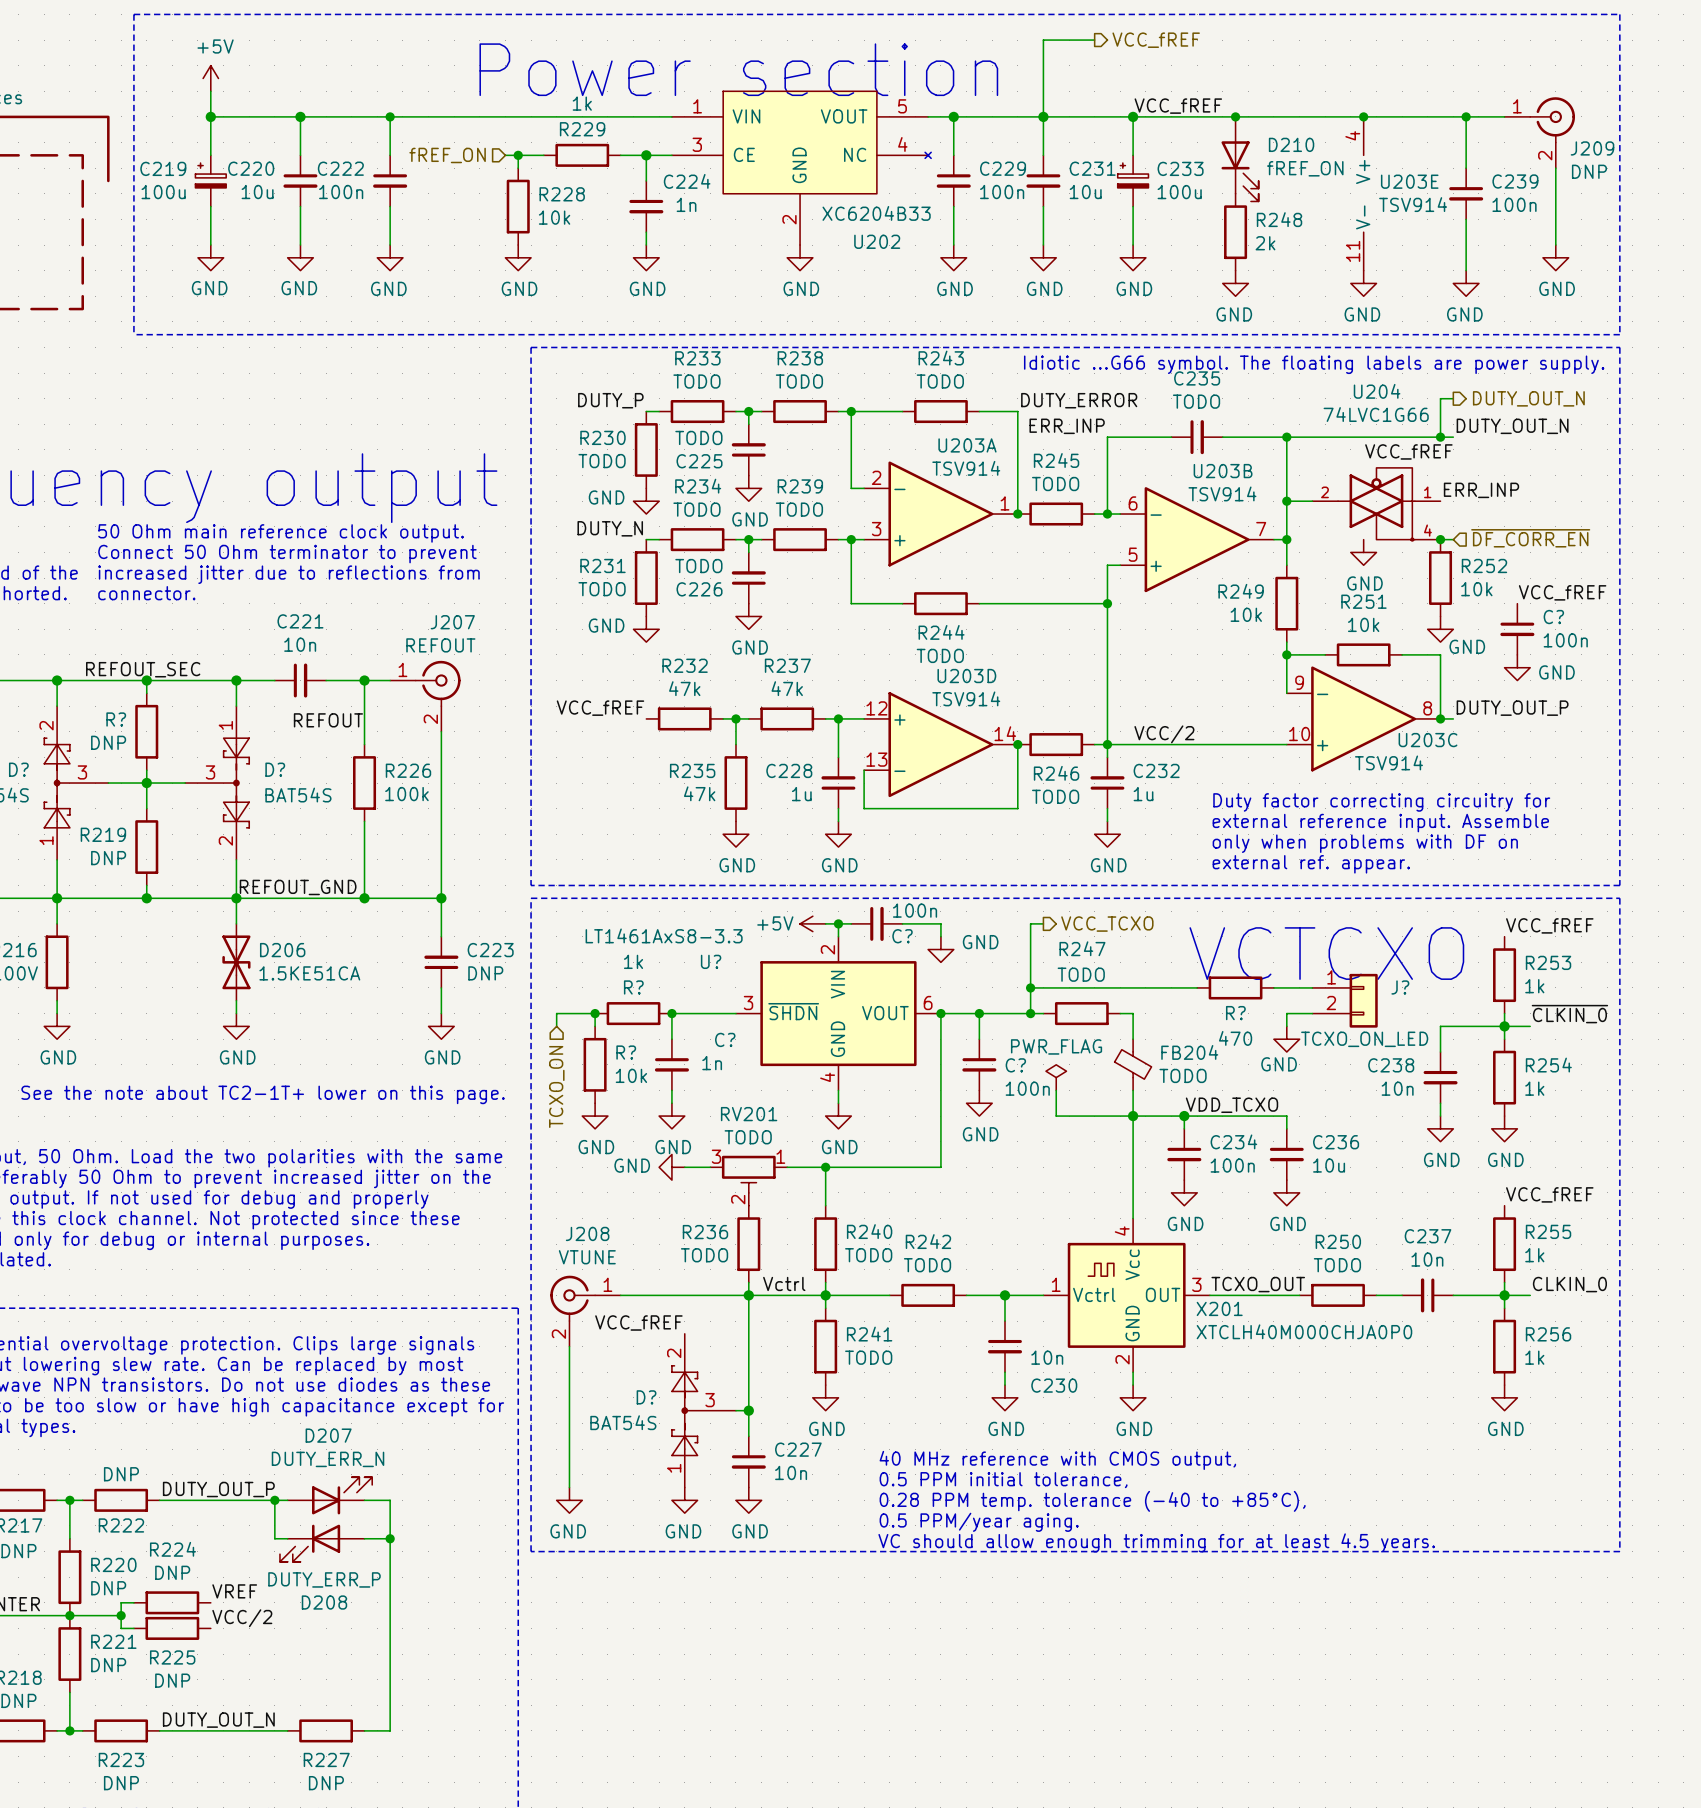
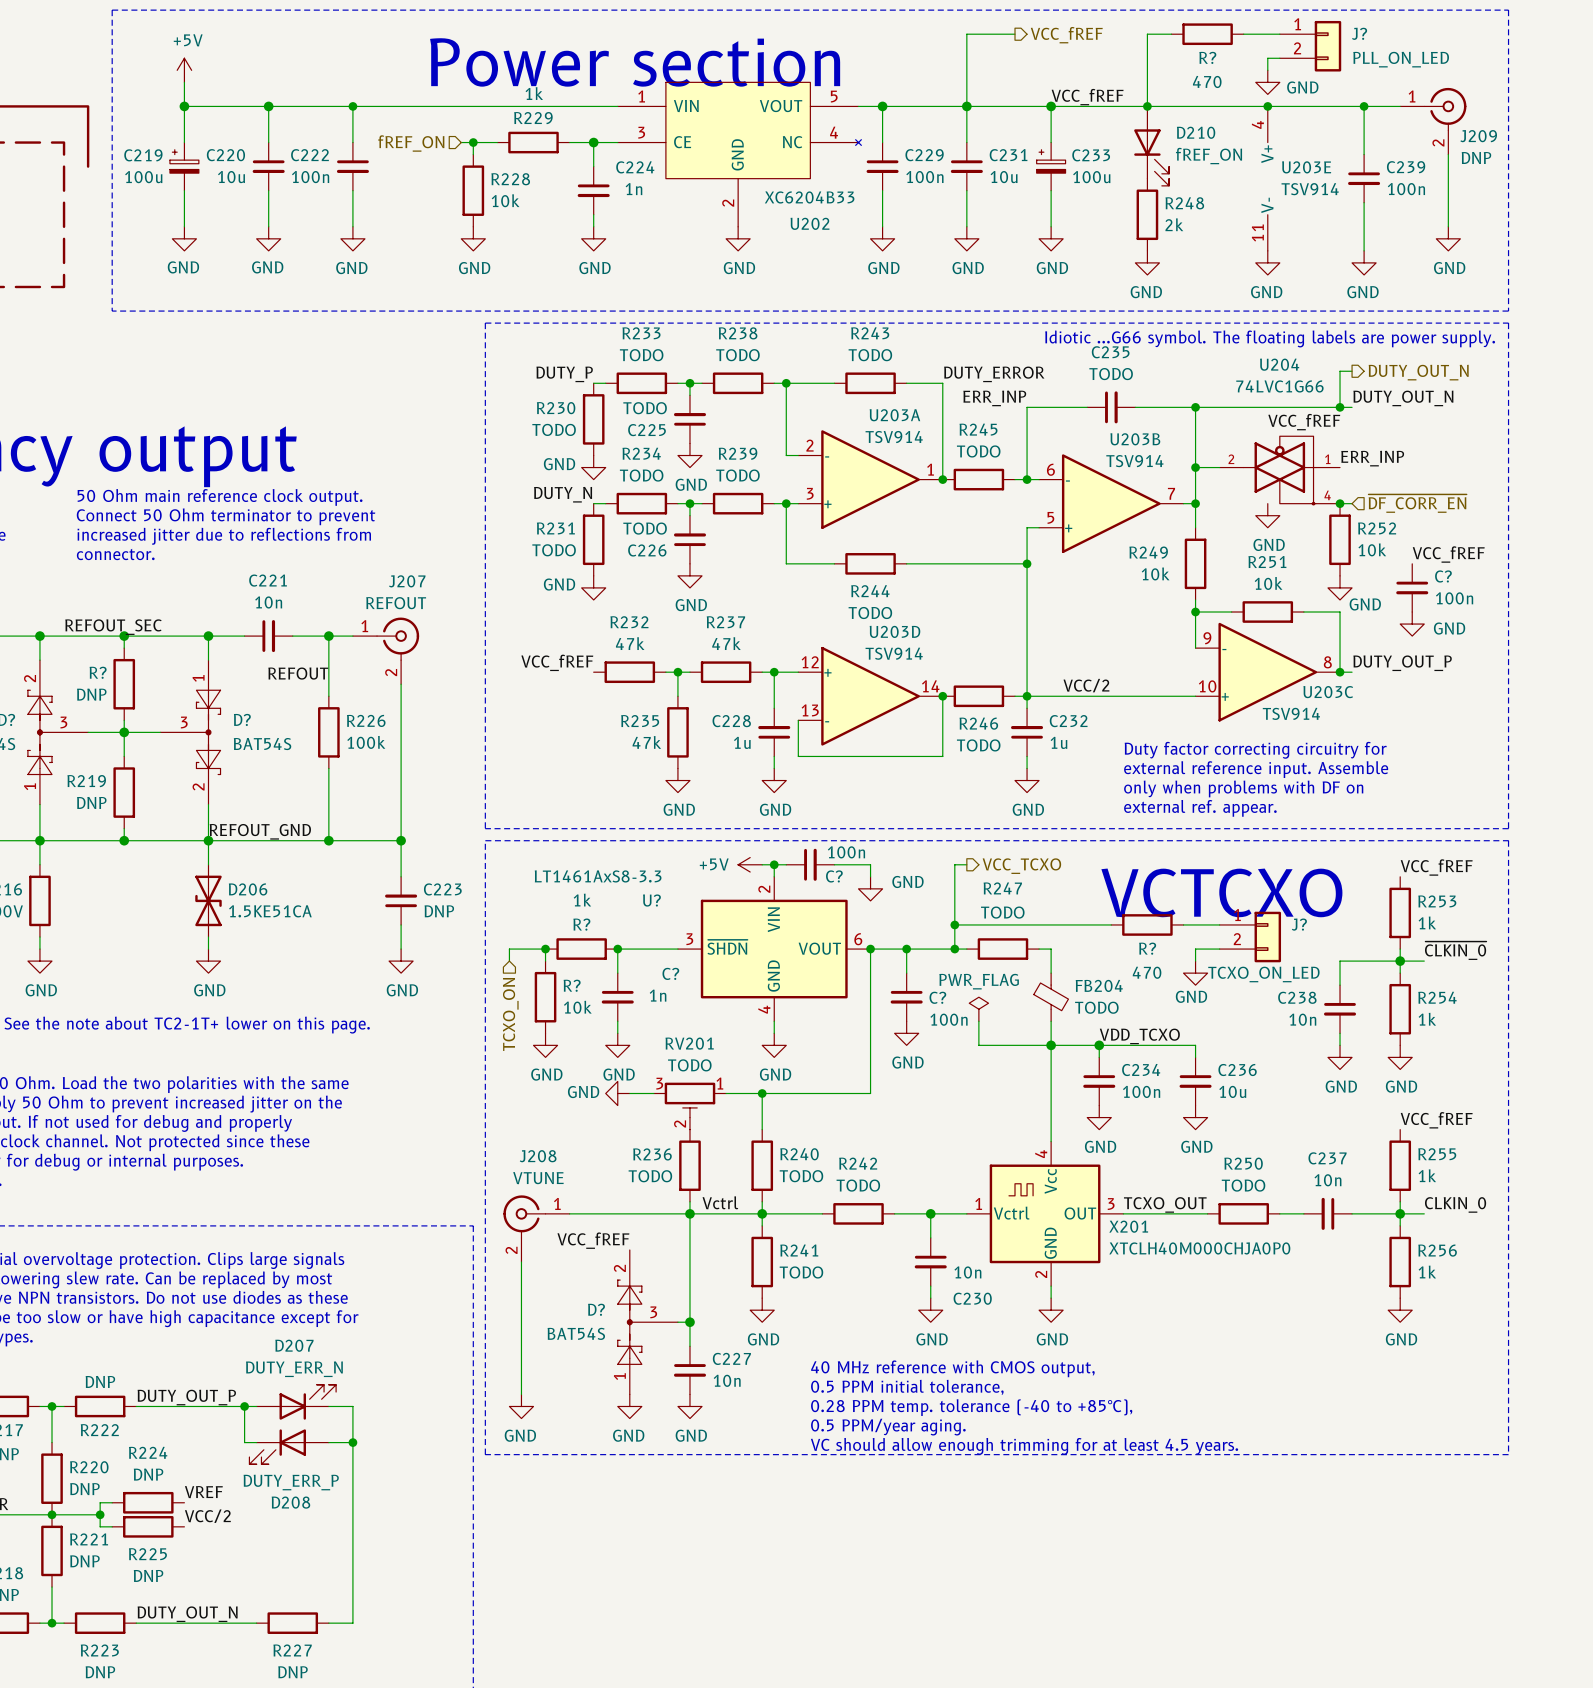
wire: none -> (1171, 34) (1147, 34) (1147, 106)
R?: none -> 470 (1207, 34)
wire: none -> (1243, 34) (1279, 34)
J?: none -> PLL_ON_LED (1310, 46)
wire: none -> (1279, 58) (1267, 58) (1267, 70)
power symbol: none -> GND (1267, 82)

